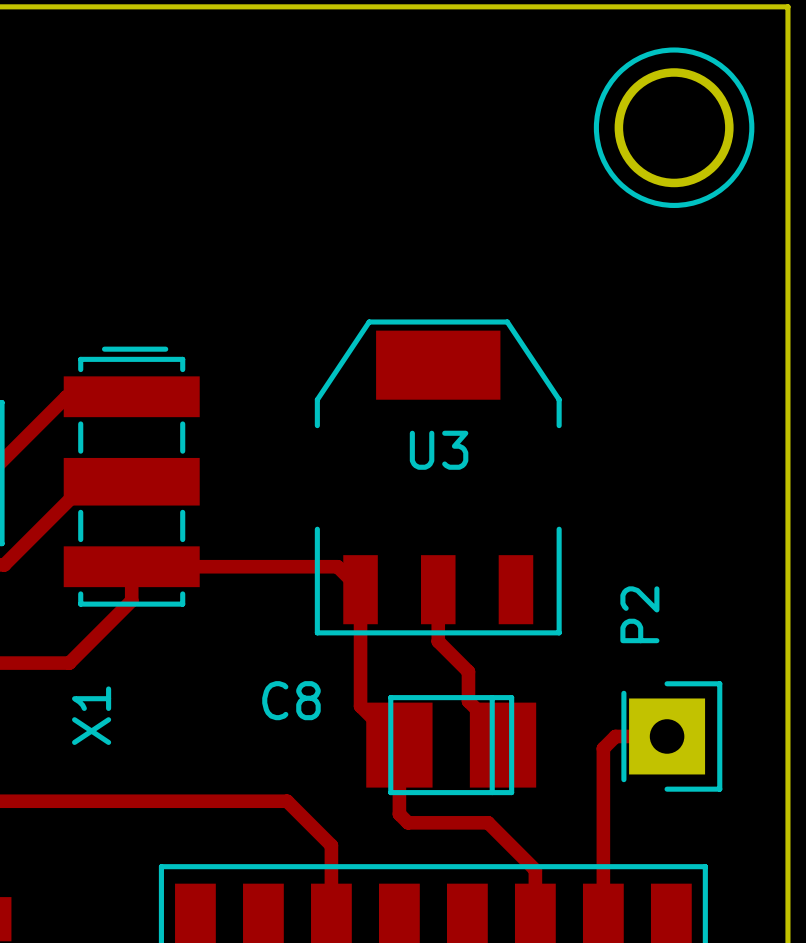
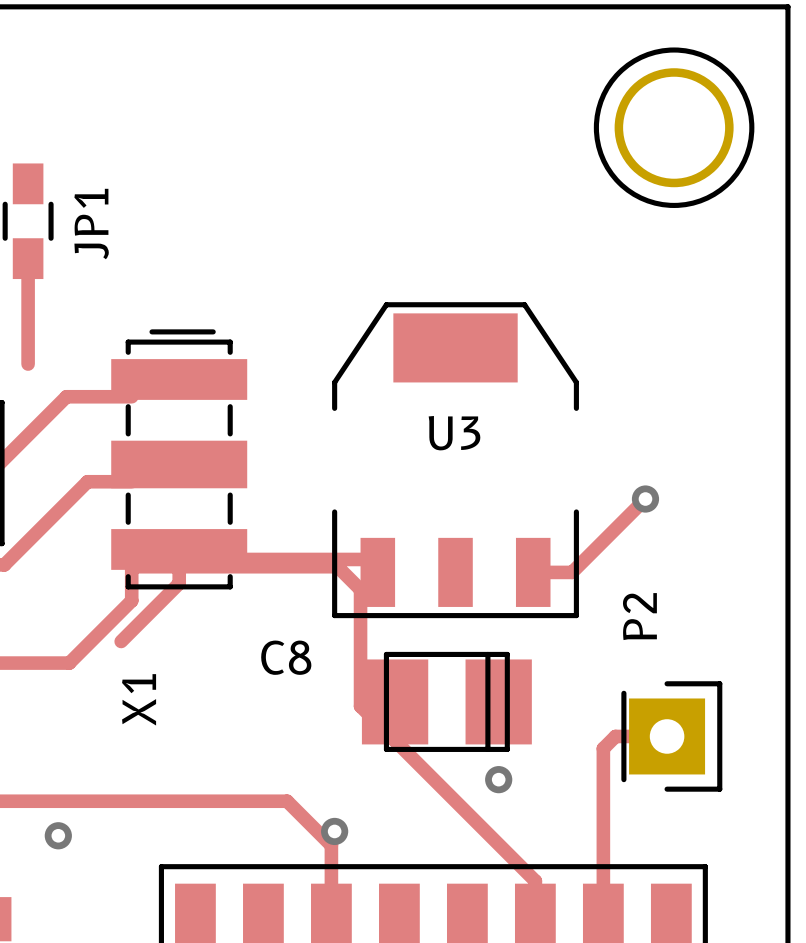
JP1: none -> (28, 221)
track: none -> (28, 258) (28, 364)
X1 position: (131, 476) -> (179, 459)
U3 position: (438, 477) -> (455, 460)
track: none -> (645, 499) (572, 572) (533, 572)
via: none -> (645, 499)
track: none -> (385, 549) (375, 559) (189, 559) (179, 549) (179, 583) (121, 641)
track: (438, 589) (438, 641) (468, 671) (468, 701) (503, 735) (503, 745) -> none
track: (399, 745) (399, 814) (408, 822) (488, 822) (535, 870) (535, 881) -> (399, 745) (535, 881)
C8 position: (451, 745) -> (446, 701)
via: none -> (498, 779)
via: none -> (334, 831)
via: none -> (58, 835)

